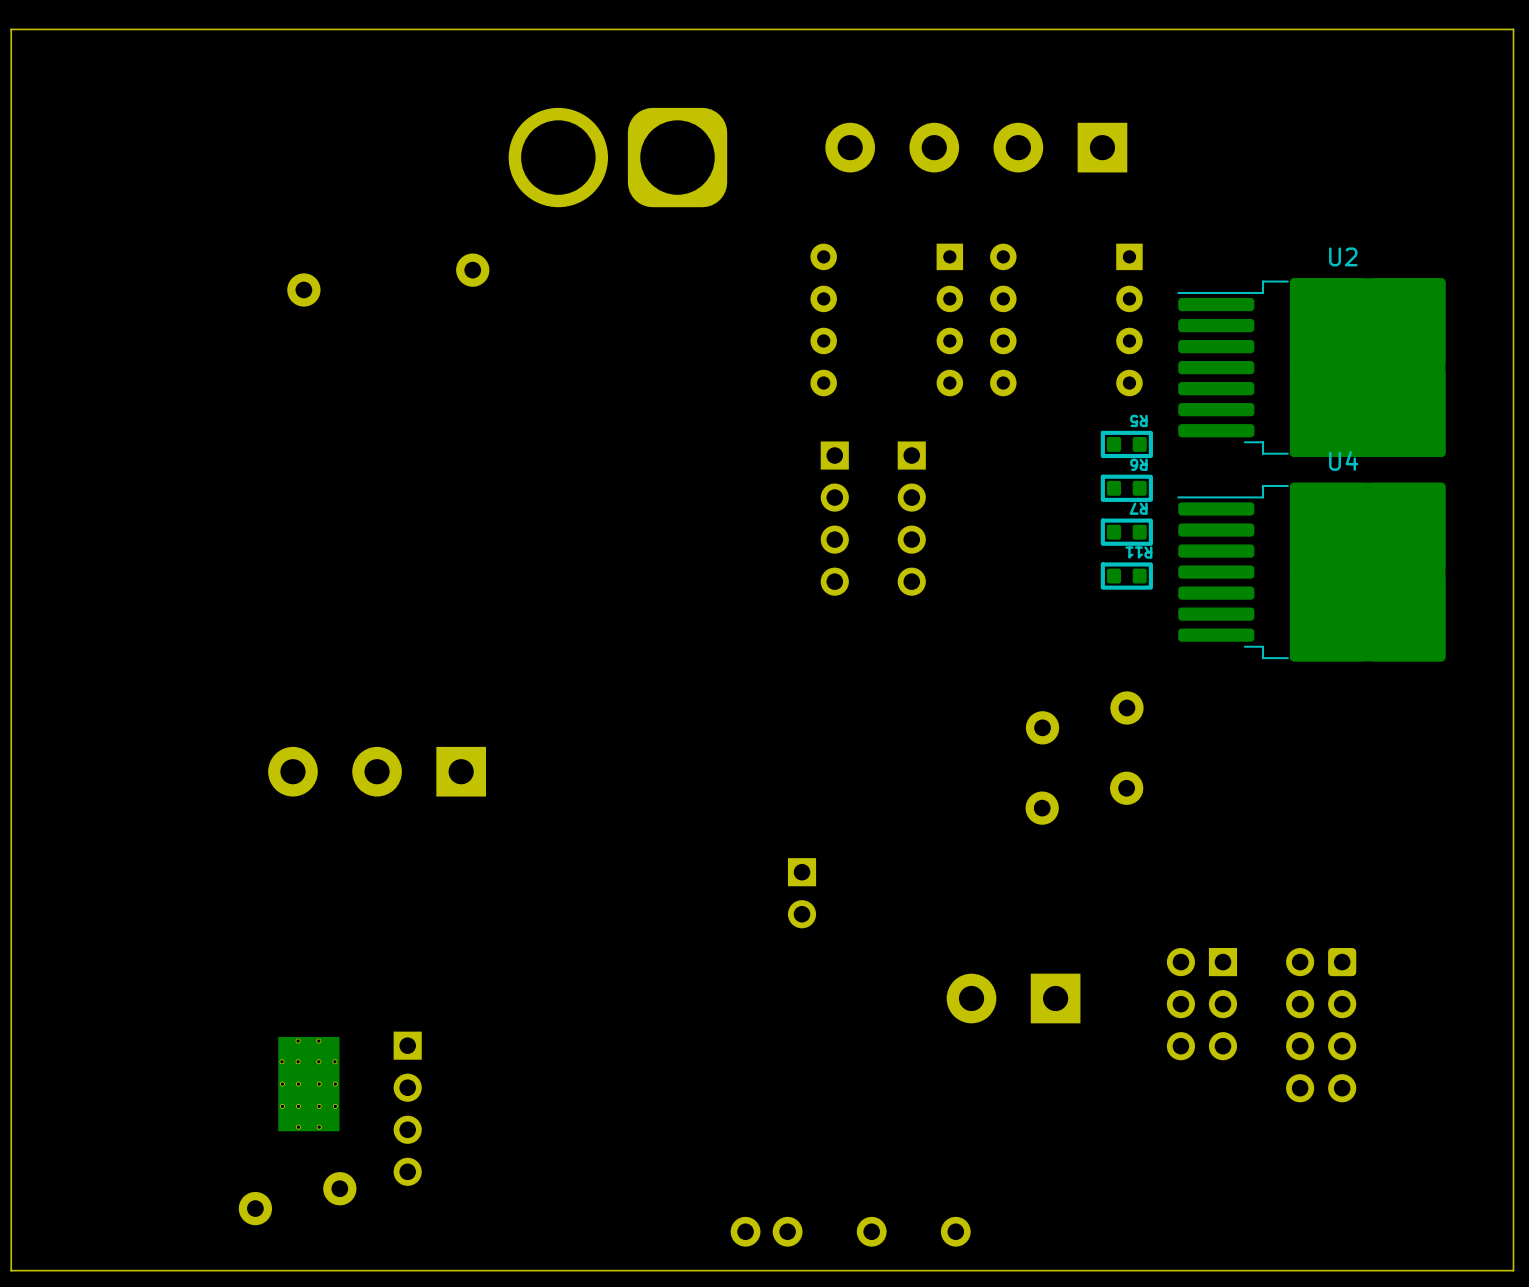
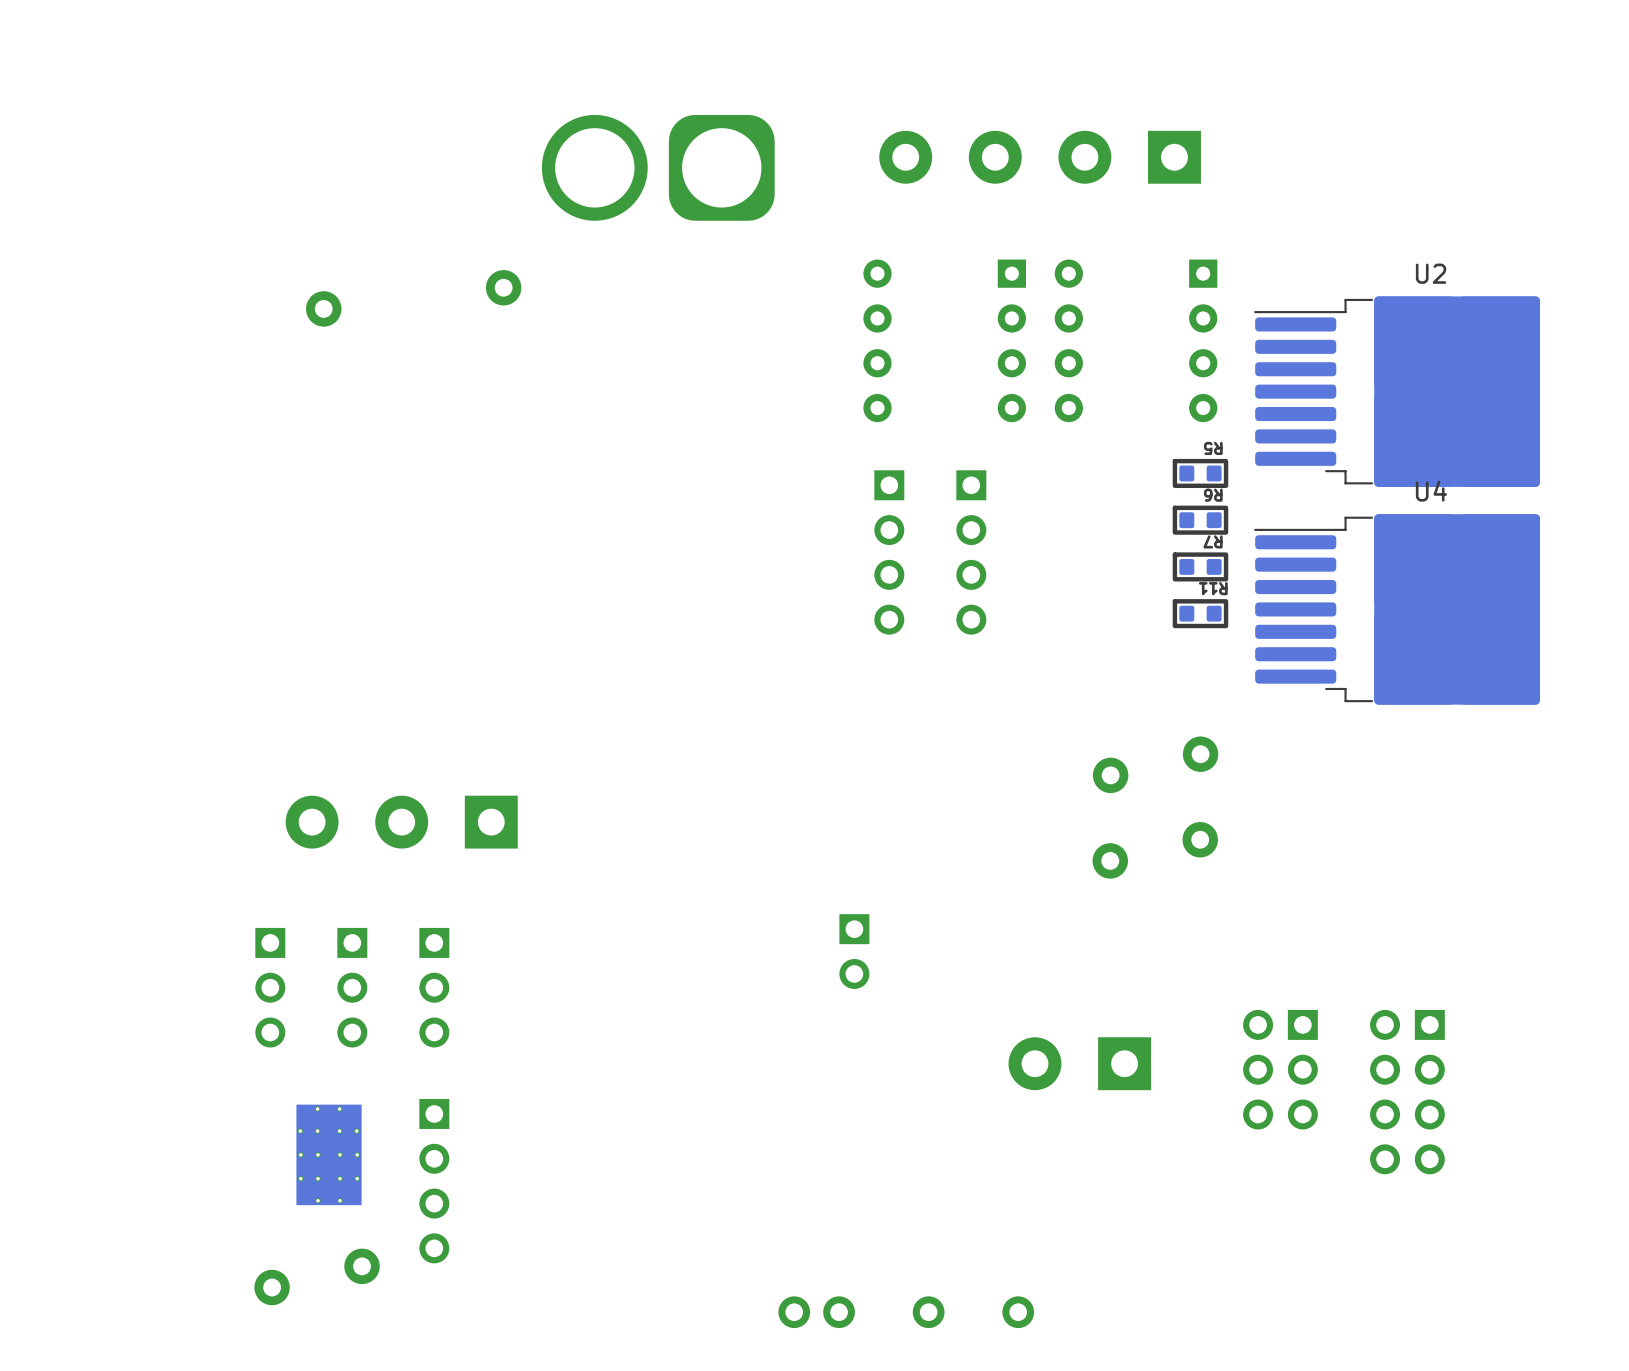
board edge: (1513, 29) (11, 29) (11, 1270) (1513, 1270) (1513, 29) -> none
part: none -> (270, 987)
part: none -> (352, 987)
part: none -> (434, 987)
part footprint: [1286, 948, 1357, 1103] -> [1370, 1009, 1445, 1175]

